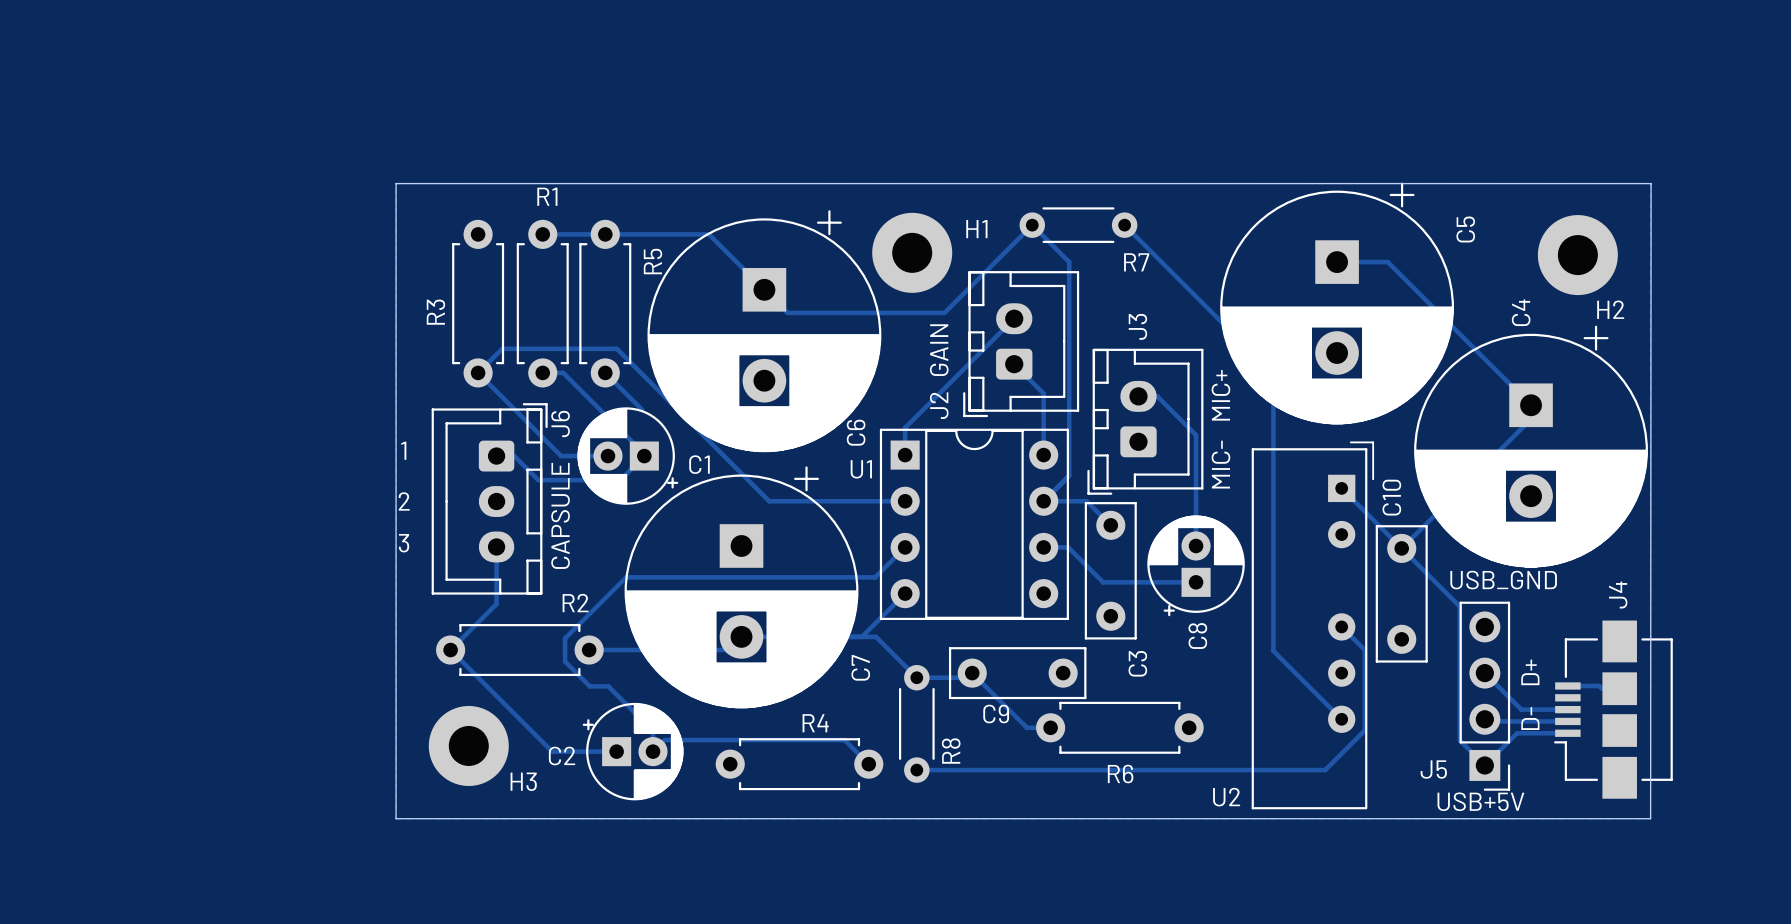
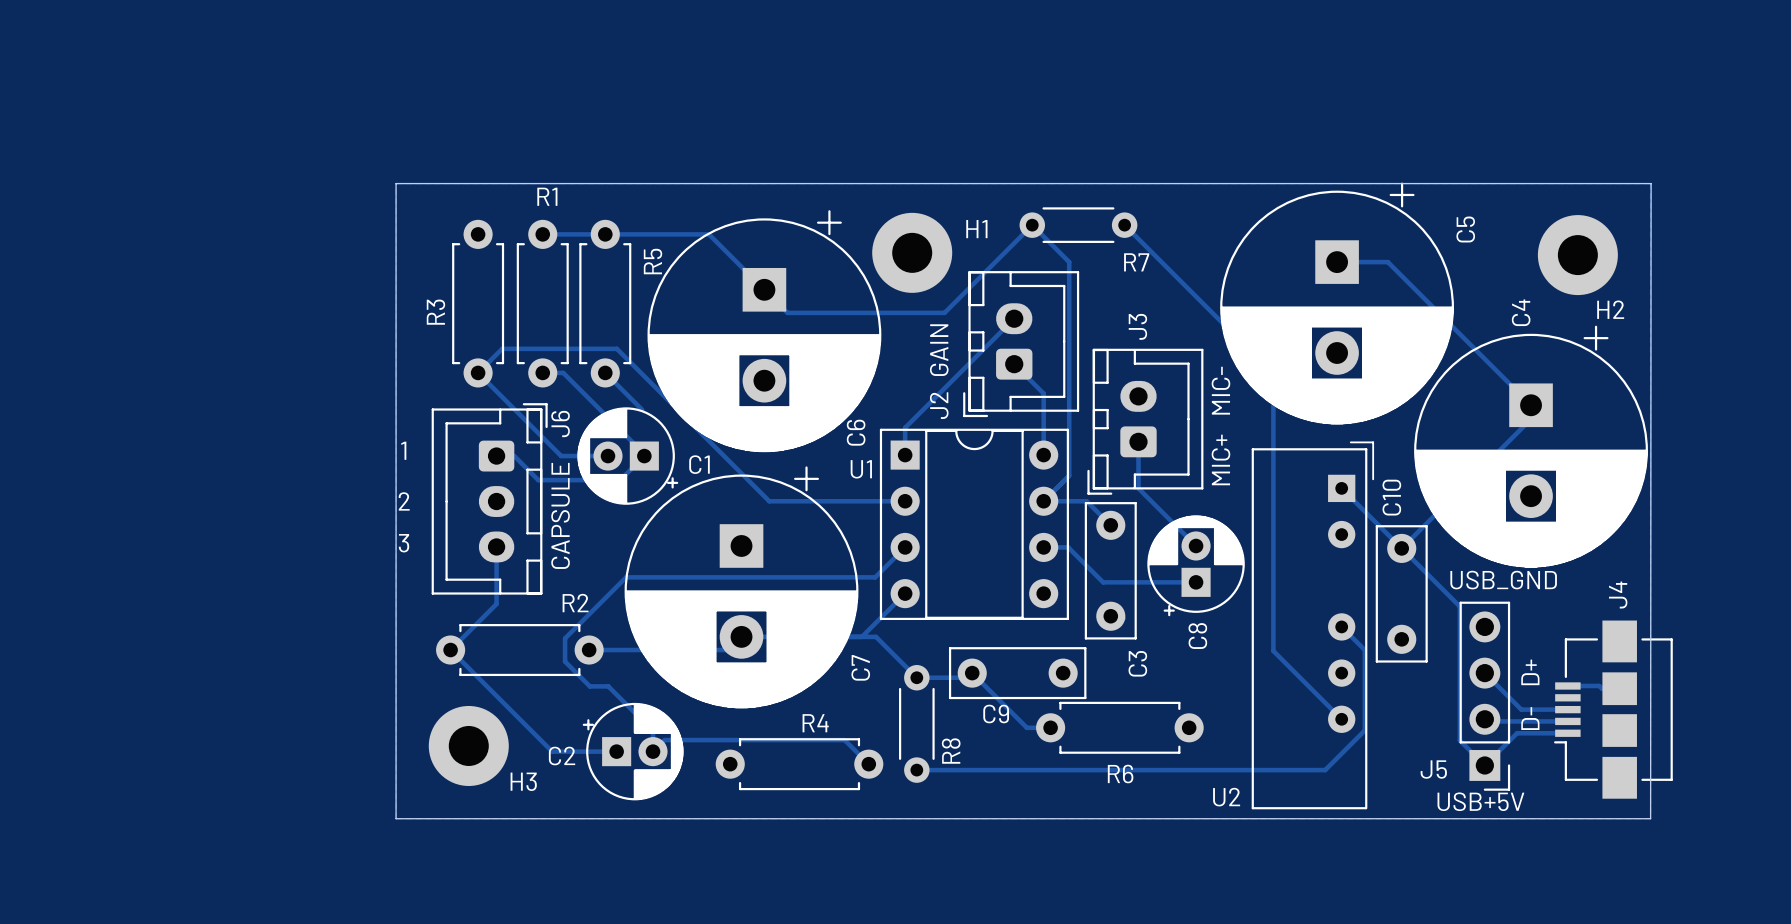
text: MIC+ (1220, 395) -> MIC- (1220, 390)
track: (1138, 396) (1157, 396) (1196, 435) (1196, 545) -> (1138, 437) (1138, 488) (1196, 545)
text: MIC- (1220, 464) -> MIC+ (1220, 459)

